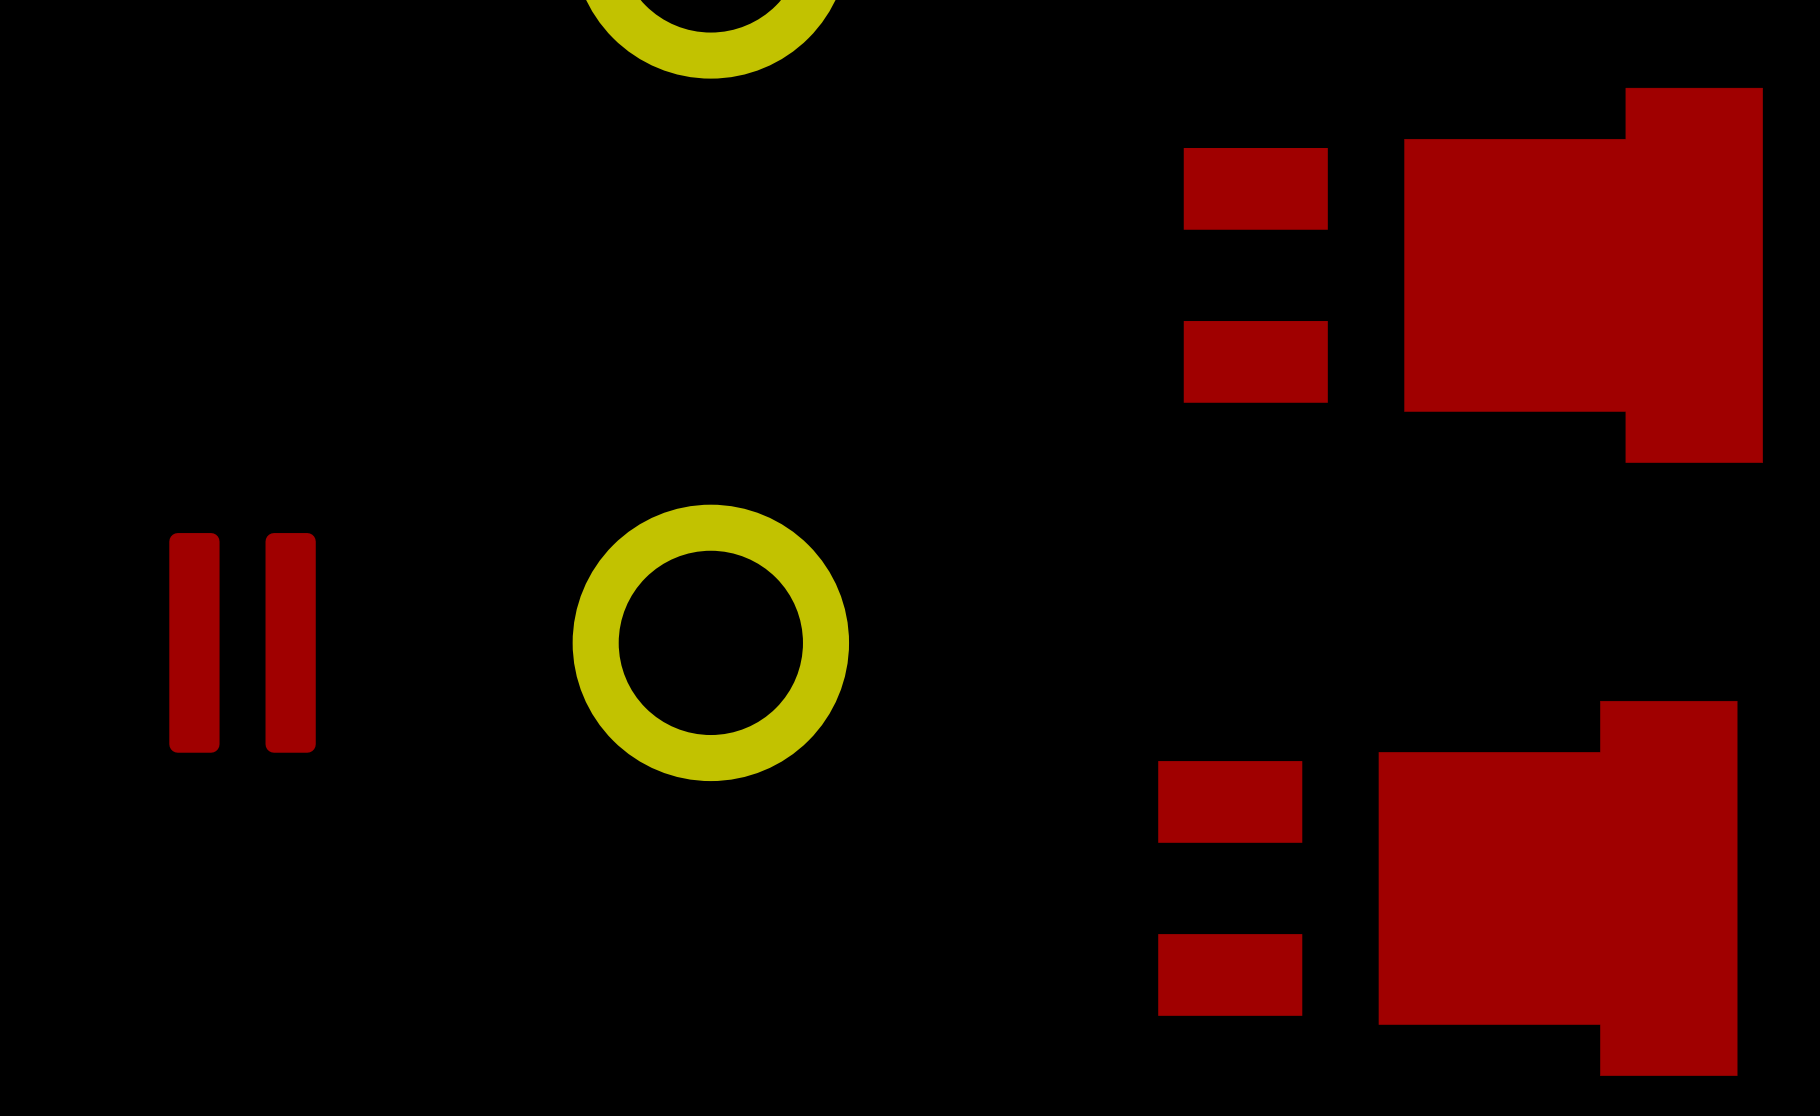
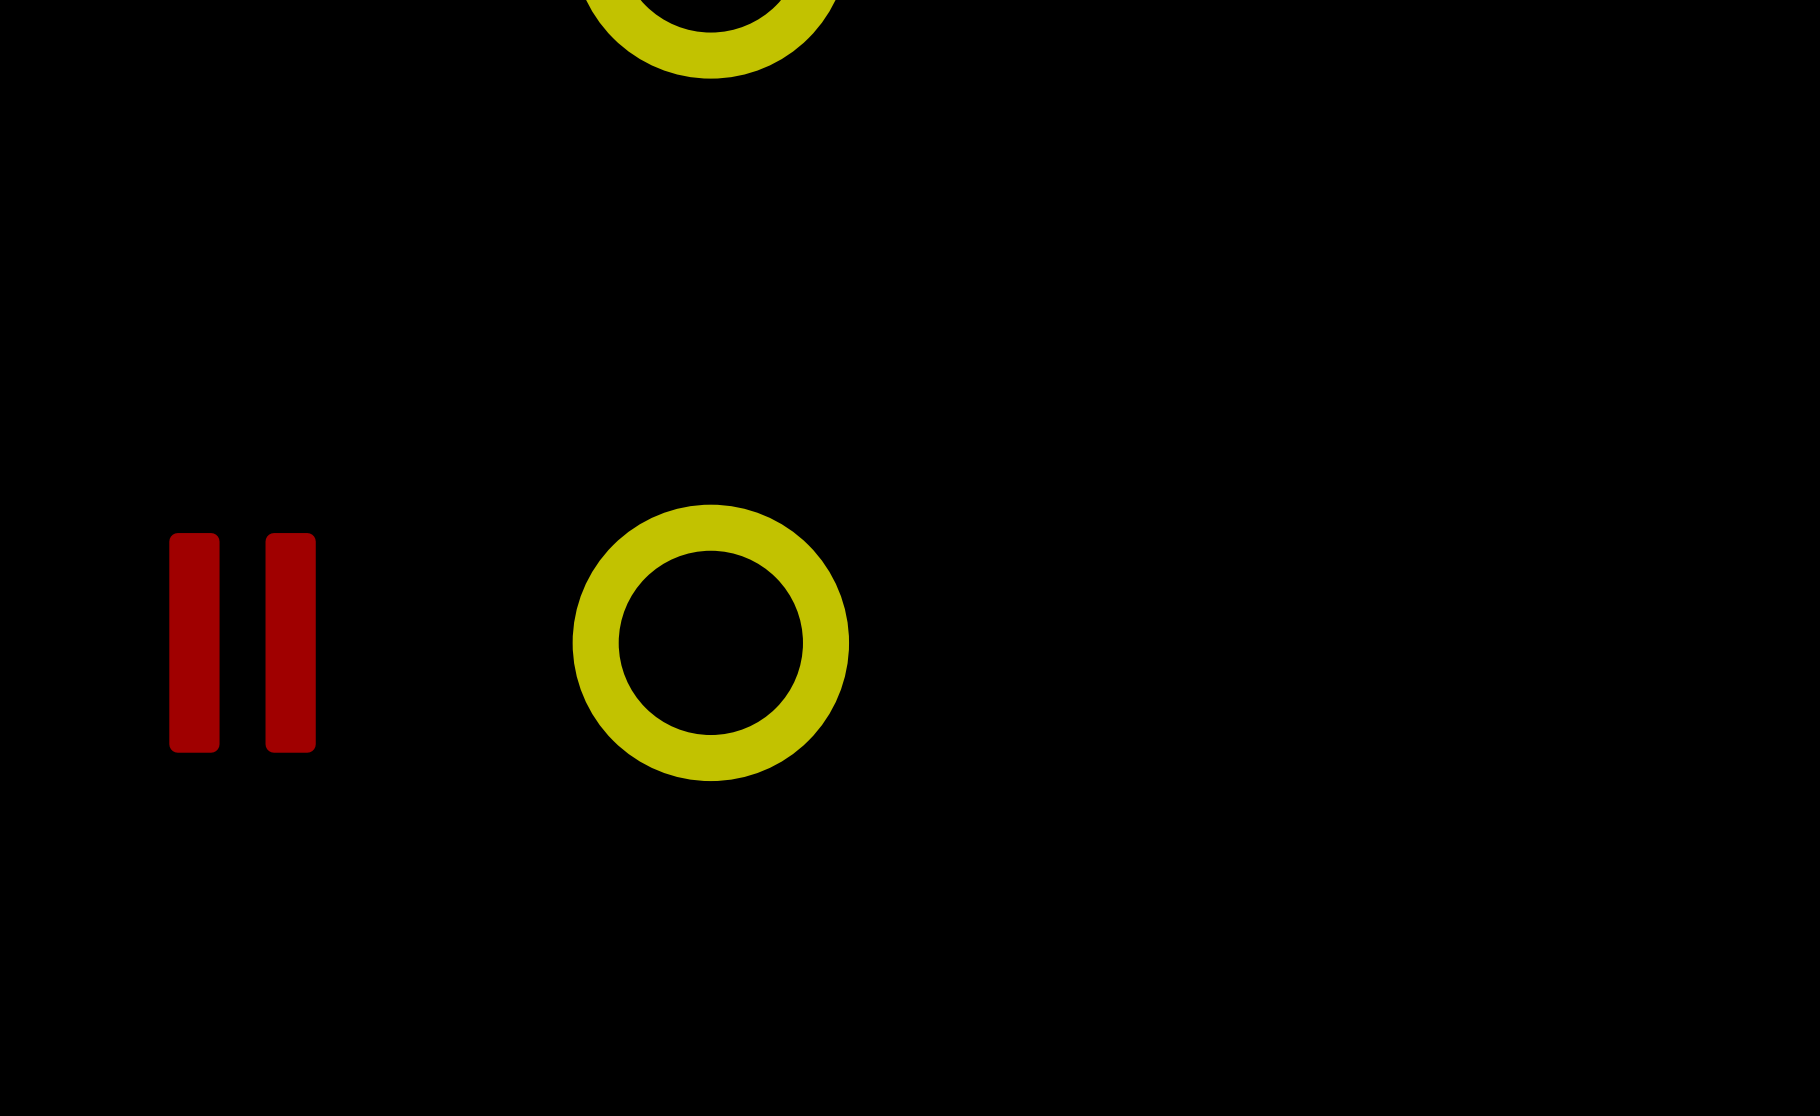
part: (1473, 275) -> none
part: (1447, 888) -> none

